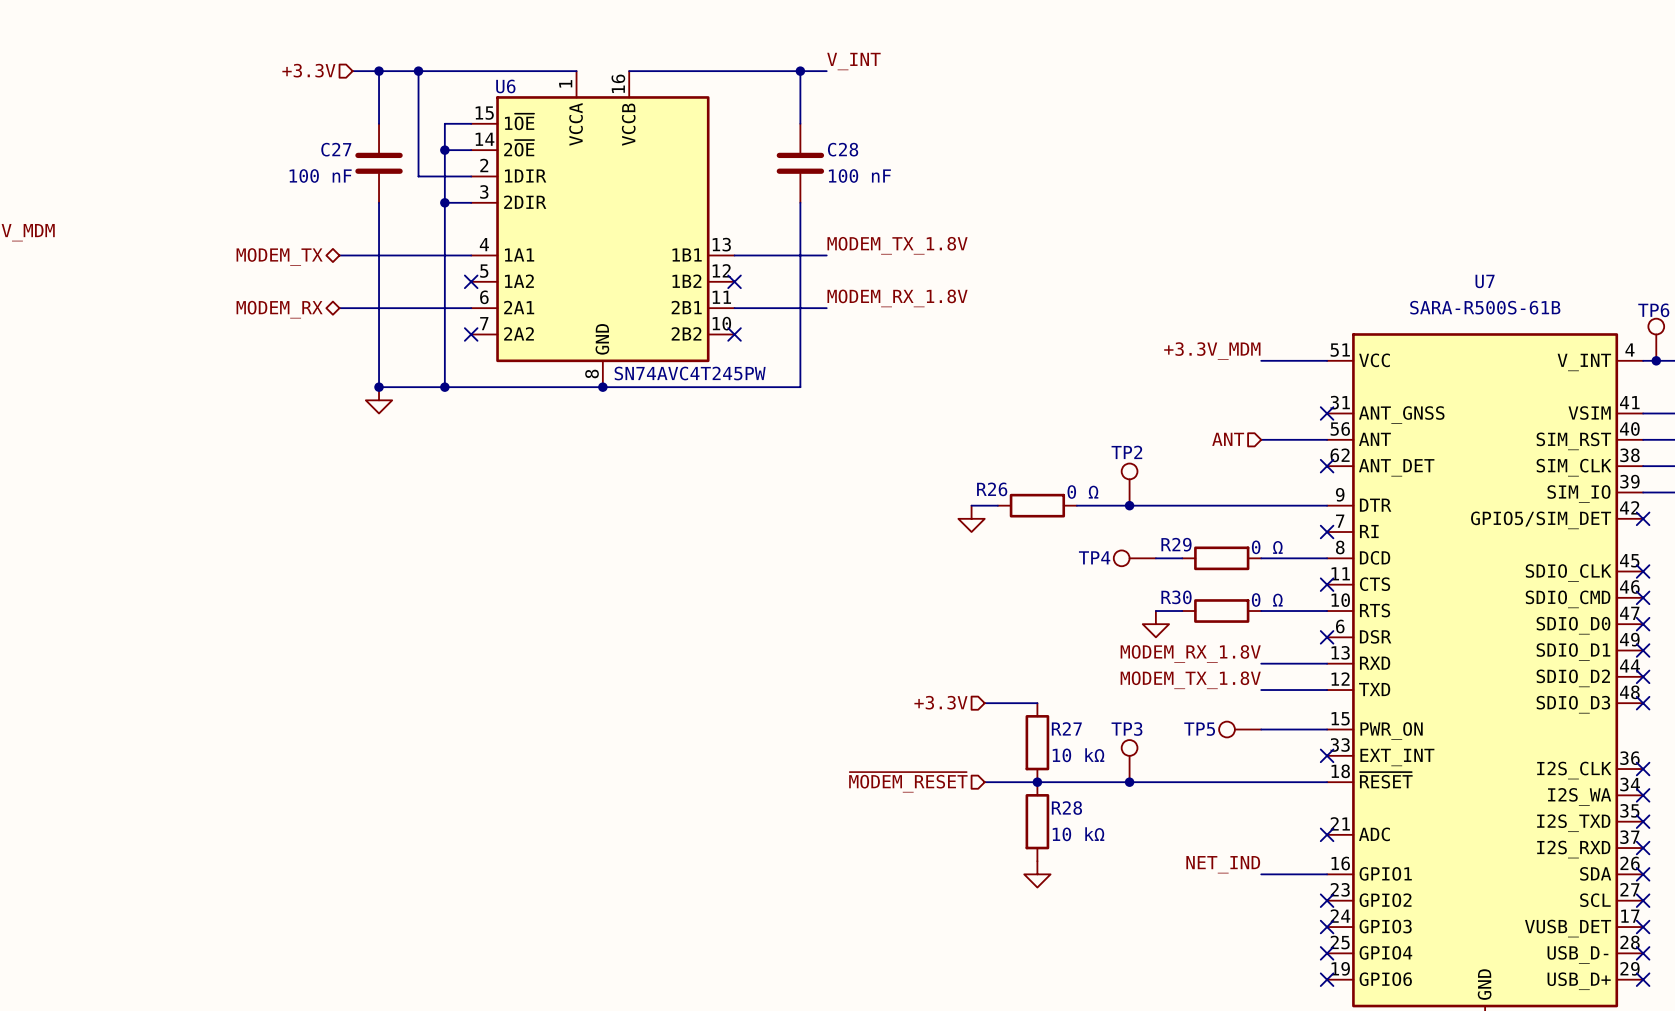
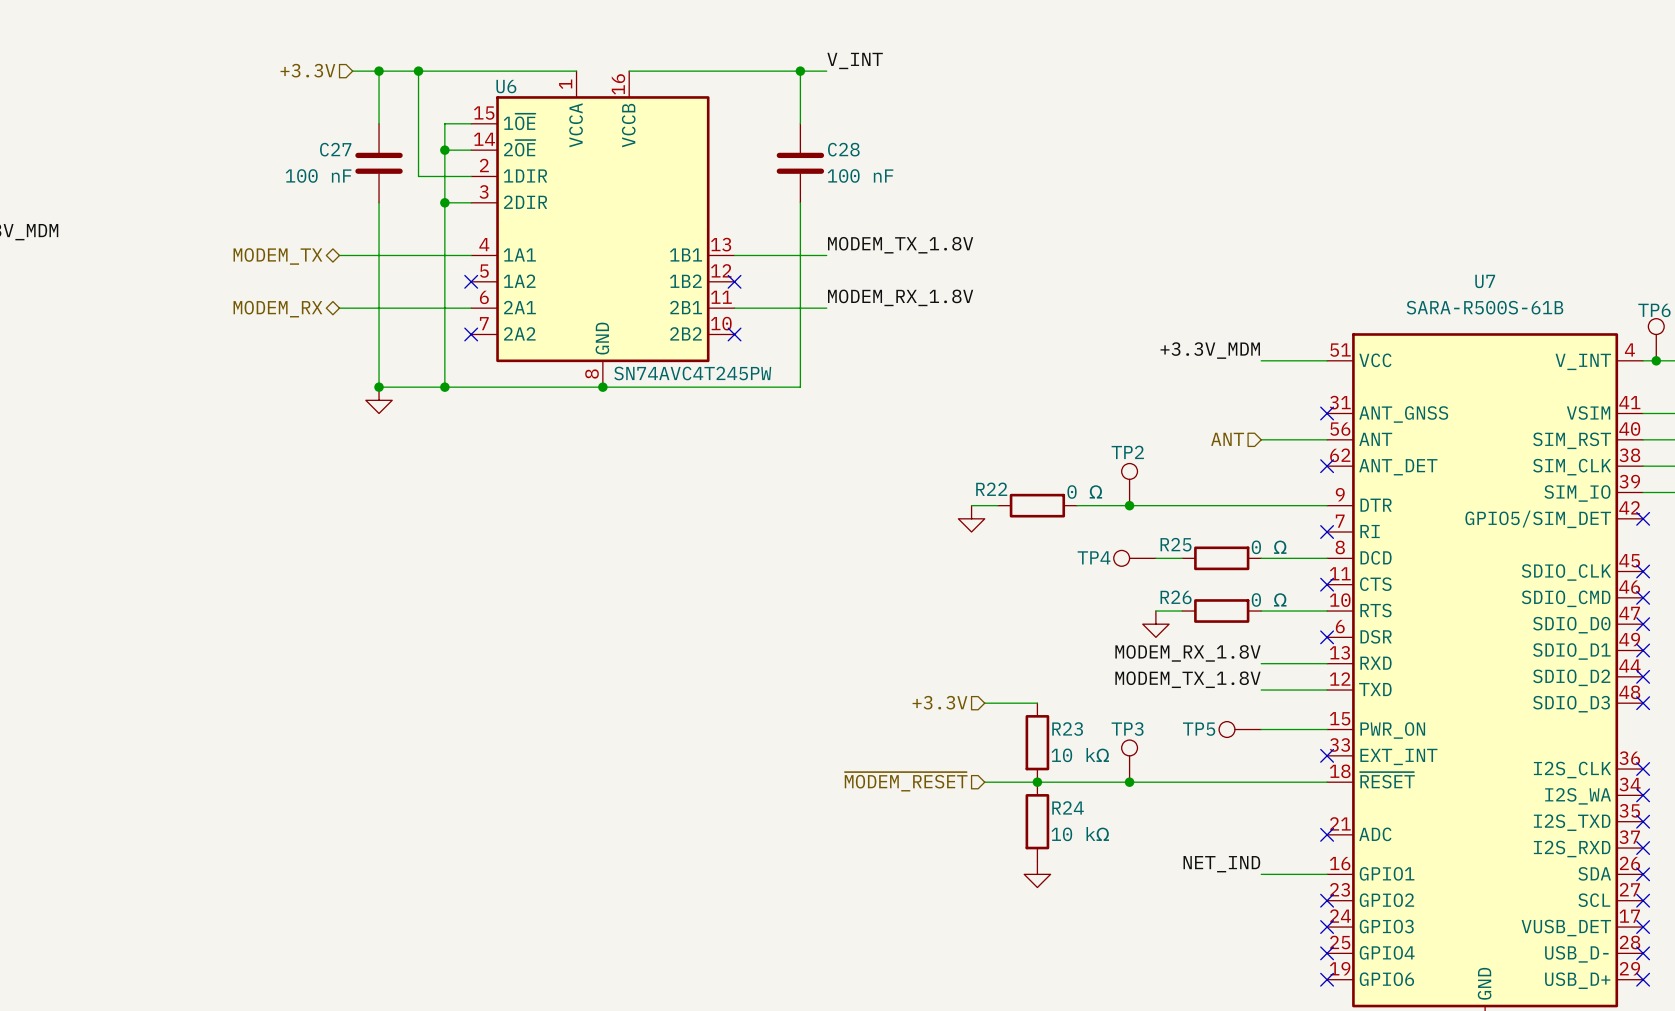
R26 name: R26 (992, 489) -> R22 (991, 489)
R29 name: R29 (1176, 544) -> R25 (1176, 544)
R30 name: R30 (1176, 597) -> R26 (1176, 597)
R27 name: R27 (1066, 728) -> R23 (1067, 729)
R28 name: R28 (1066, 808) -> R24 (1068, 807)

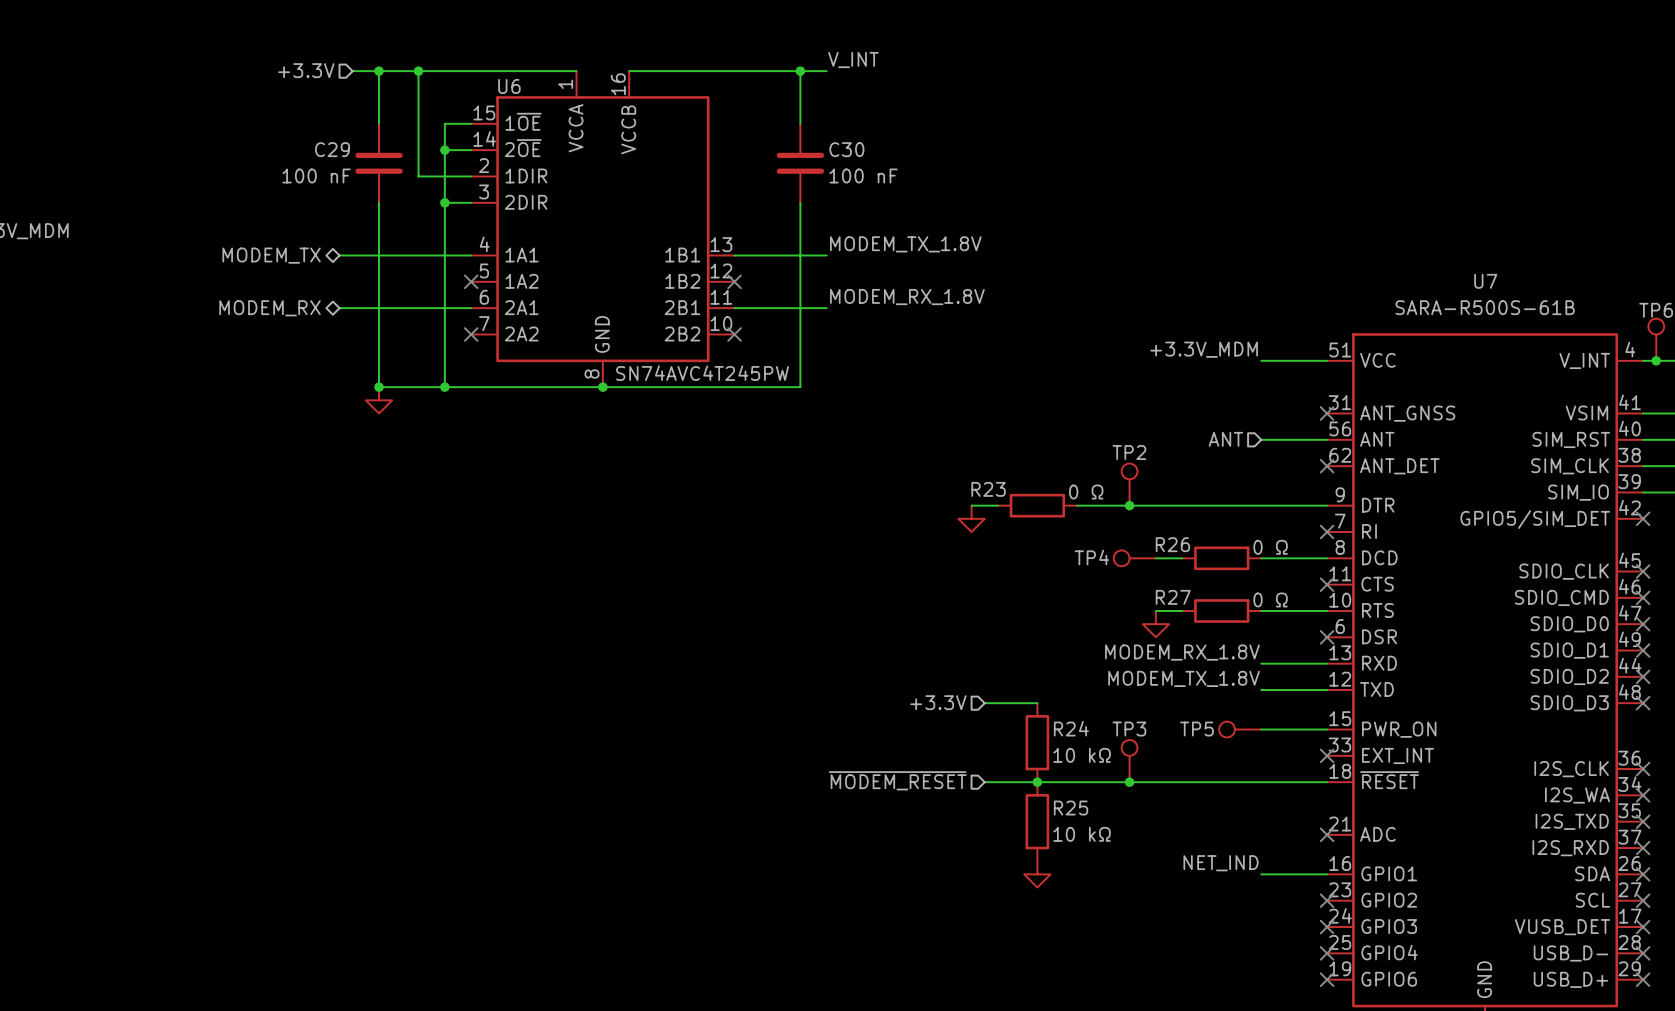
C27 name: C27 (335, 149) -> C29 (332, 149)
C28 name: C28 (843, 149) -> C30 (846, 149)
R22 name: R22 (991, 489) -> R23 (988, 489)
R25 name: R25 (1176, 544) -> R26 (1172, 544)
R26 name: R26 (1176, 597) -> R27 (1173, 597)
R23 name: R23 (1067, 729) -> R24 (1071, 728)
R24 name: R24 (1068, 807) -> R25 (1071, 808)

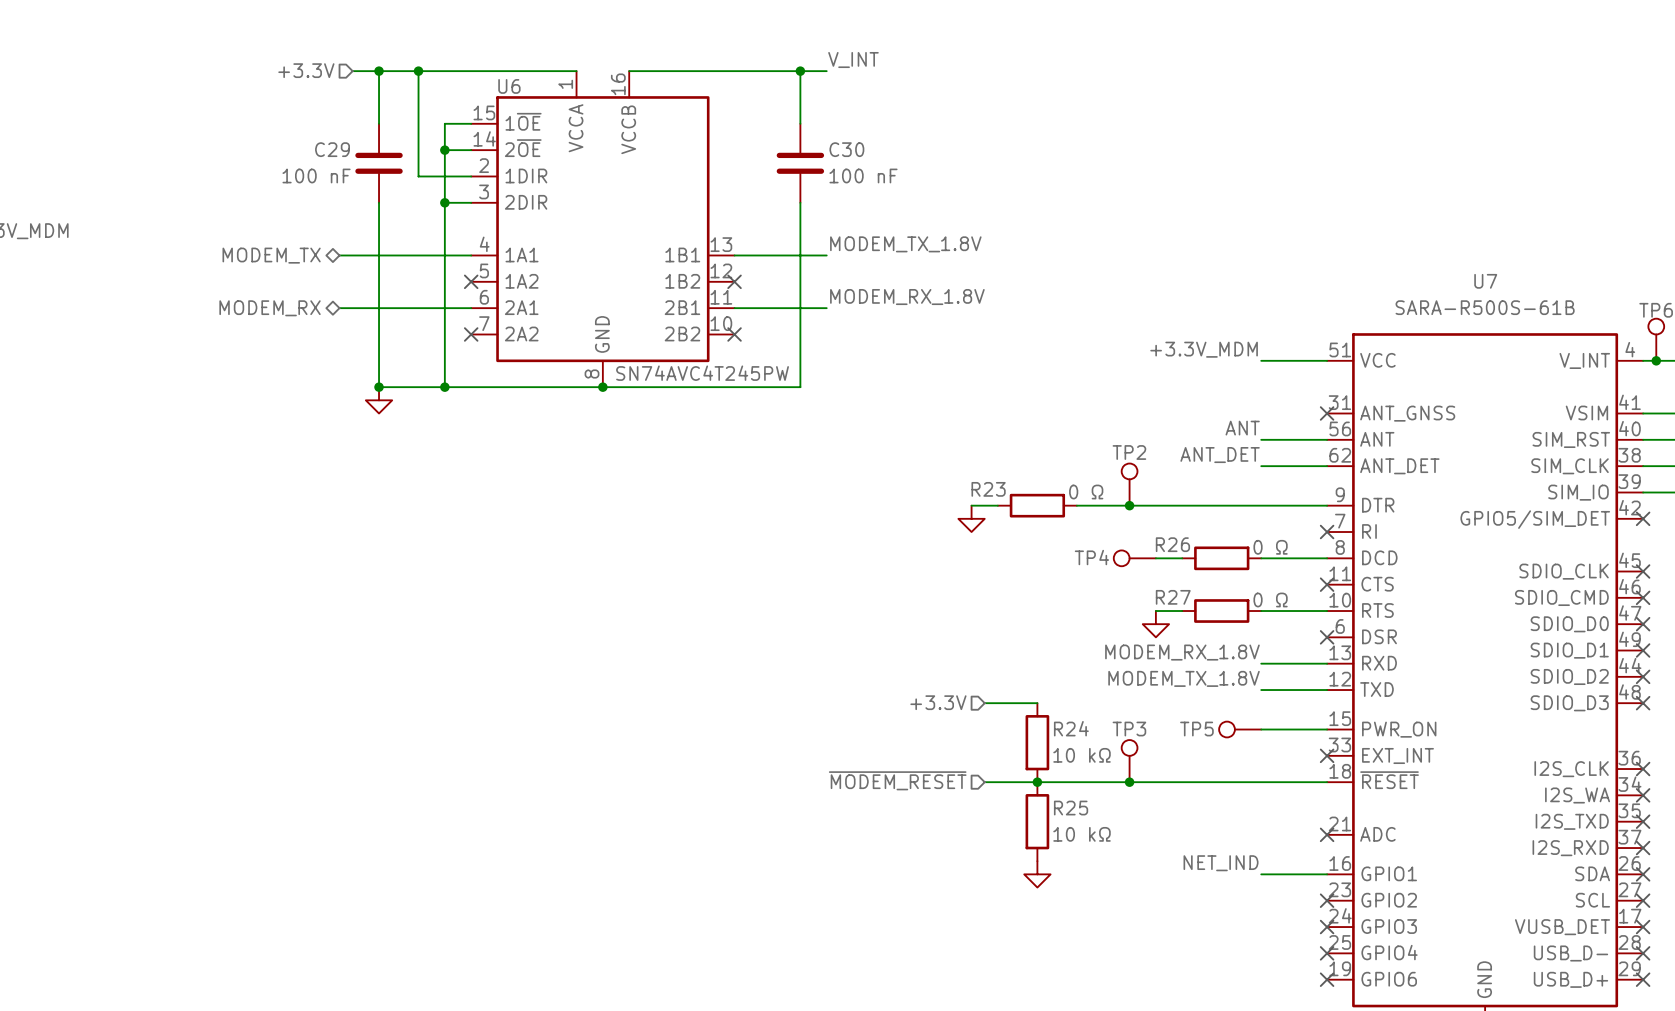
label: none -> ANT (1242, 428)
hierarchical label: ANT (1225, 439) -> none
label: none -> ANT_DET (1220, 455)
wire: none -> (1261, 466) (1327, 466)
no-connect mark: (1327, 466) -> none

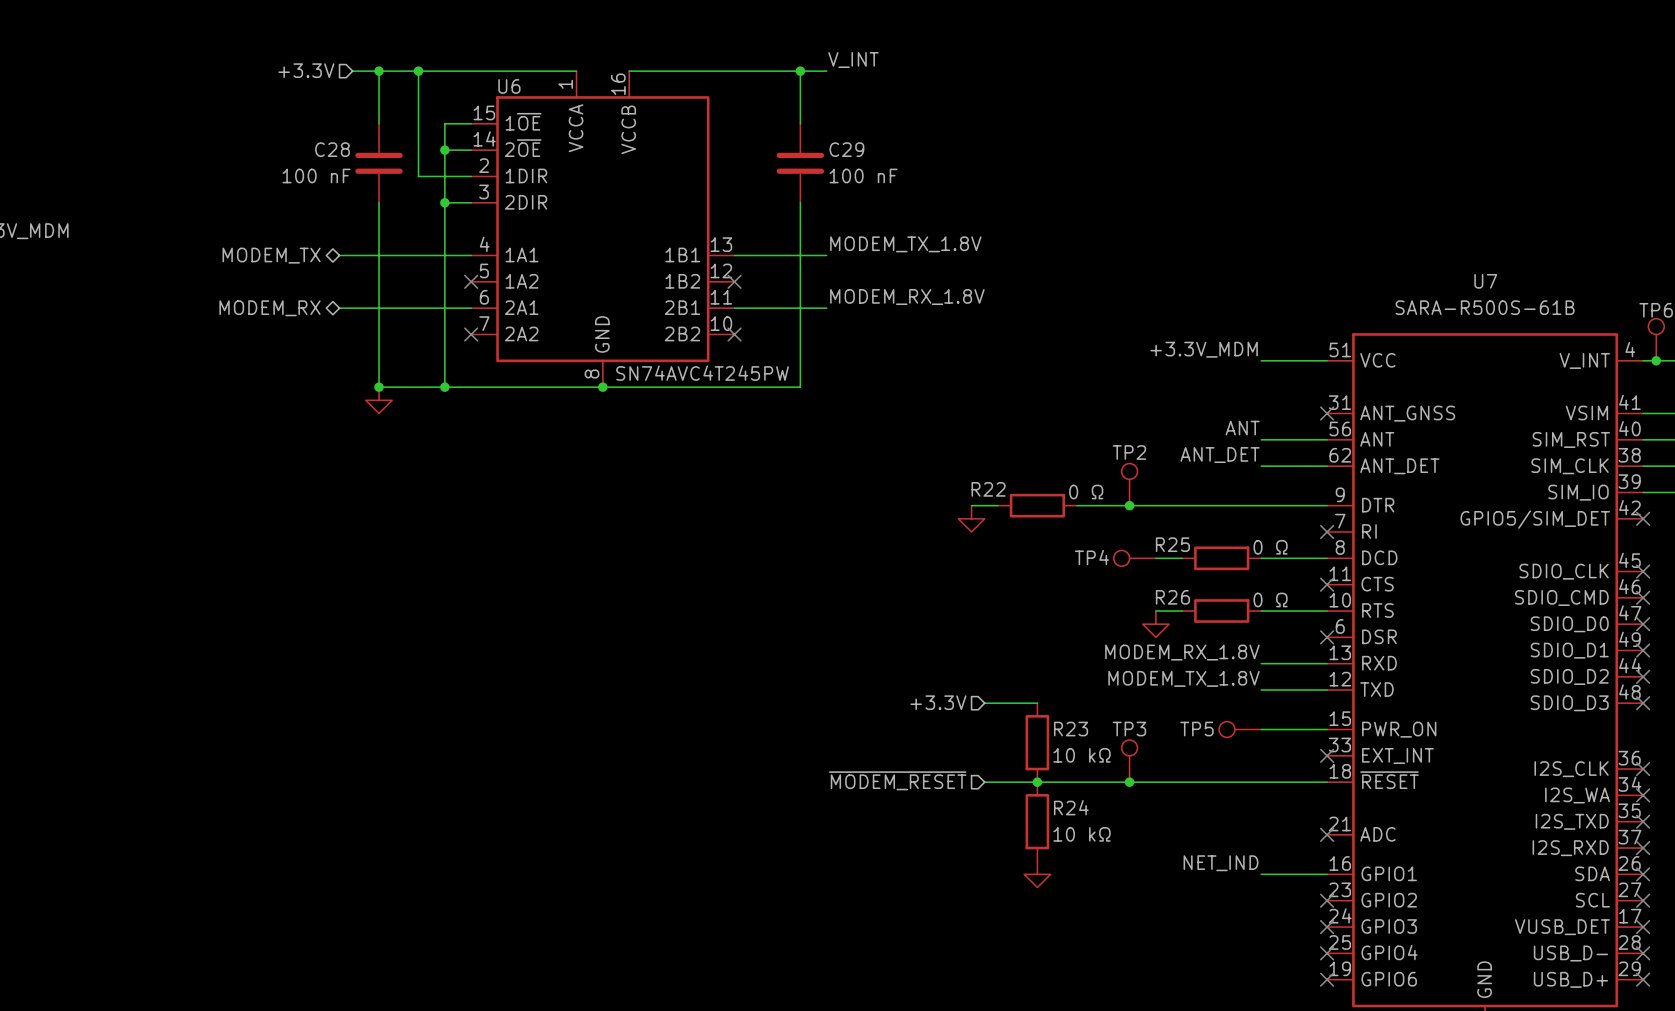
C29 name: C29 (332, 149) -> C28 (332, 149)
C30 name: C30 (846, 149) -> C29 (846, 149)
R23 name: R23 (988, 489) -> R22 (988, 489)
R26 name: R26 (1172, 544) -> R25 (1172, 544)
R27 name: R27 (1173, 597) -> R26 (1172, 597)
R24 name: R24 (1071, 728) -> R23 (1071, 729)
R25 name: R25 (1071, 808) -> R24 (1071, 807)

